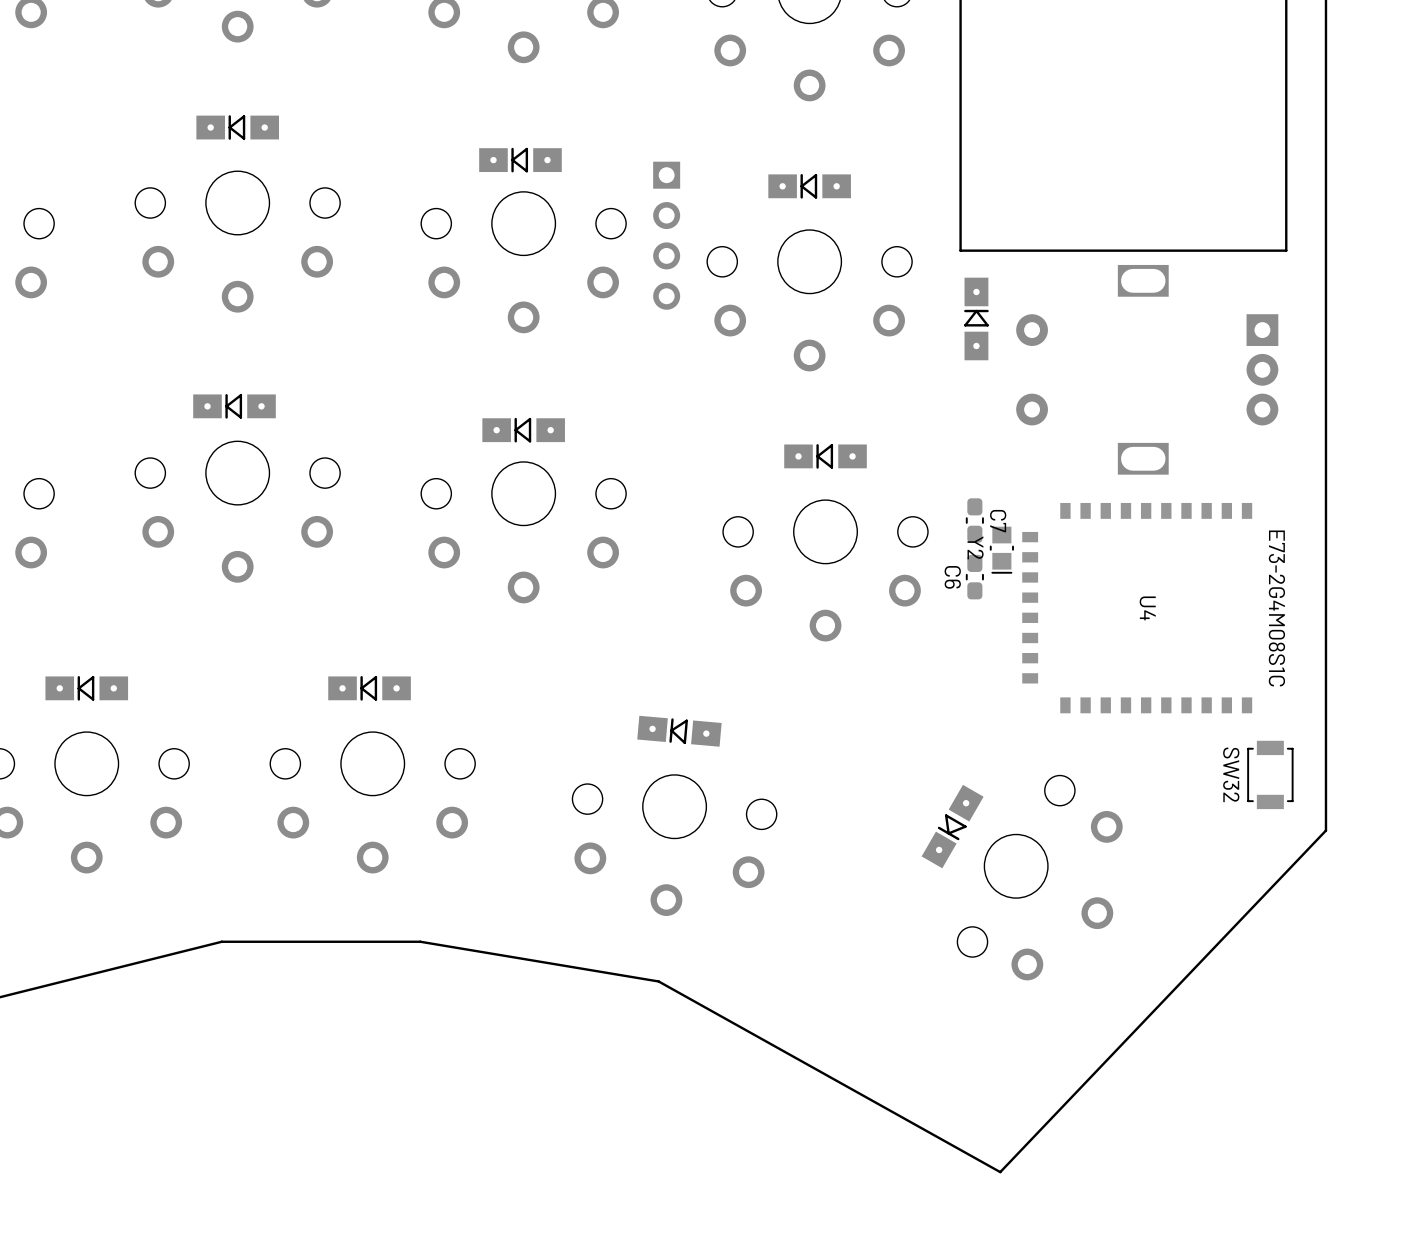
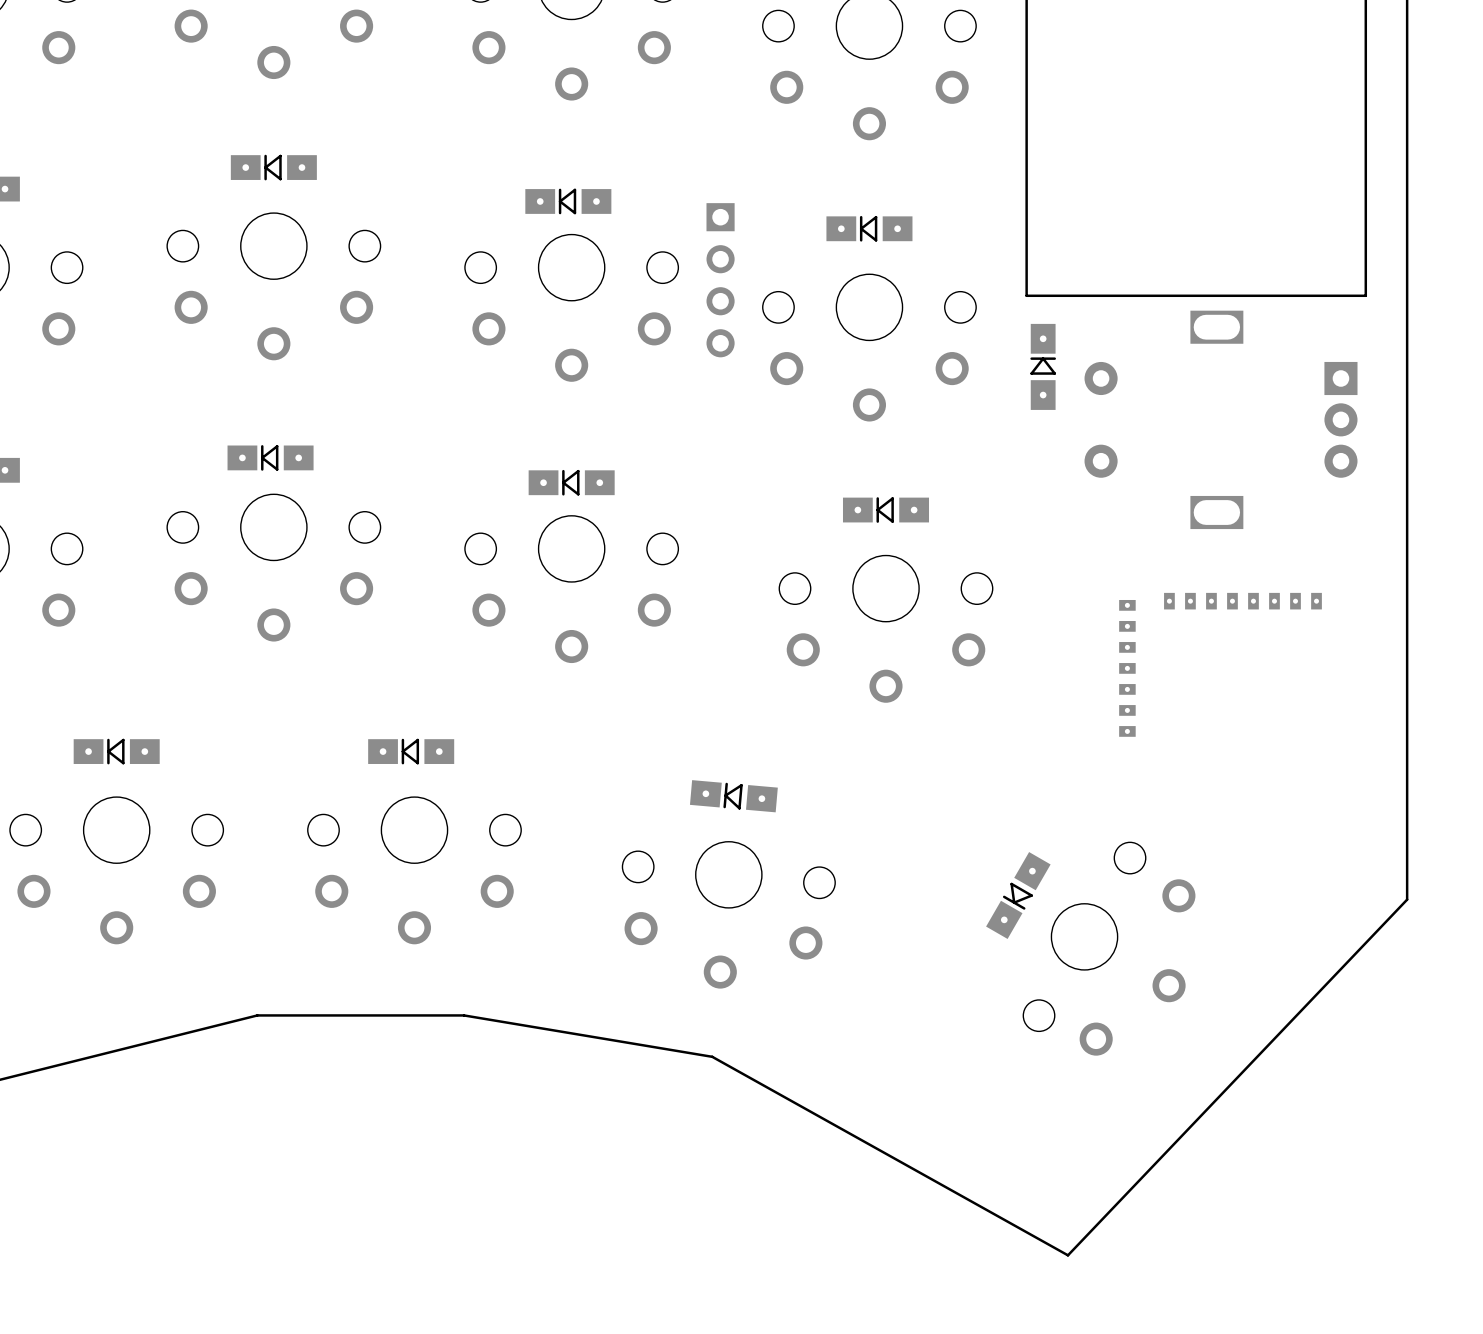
C7: (974, 520) -> none
Y2: (1001, 550) -> none
C6: (974, 577) -> none
part: none -> (1220, 664)
U4: (1137, 608) -> none
SW32: (1270, 774) -> none

